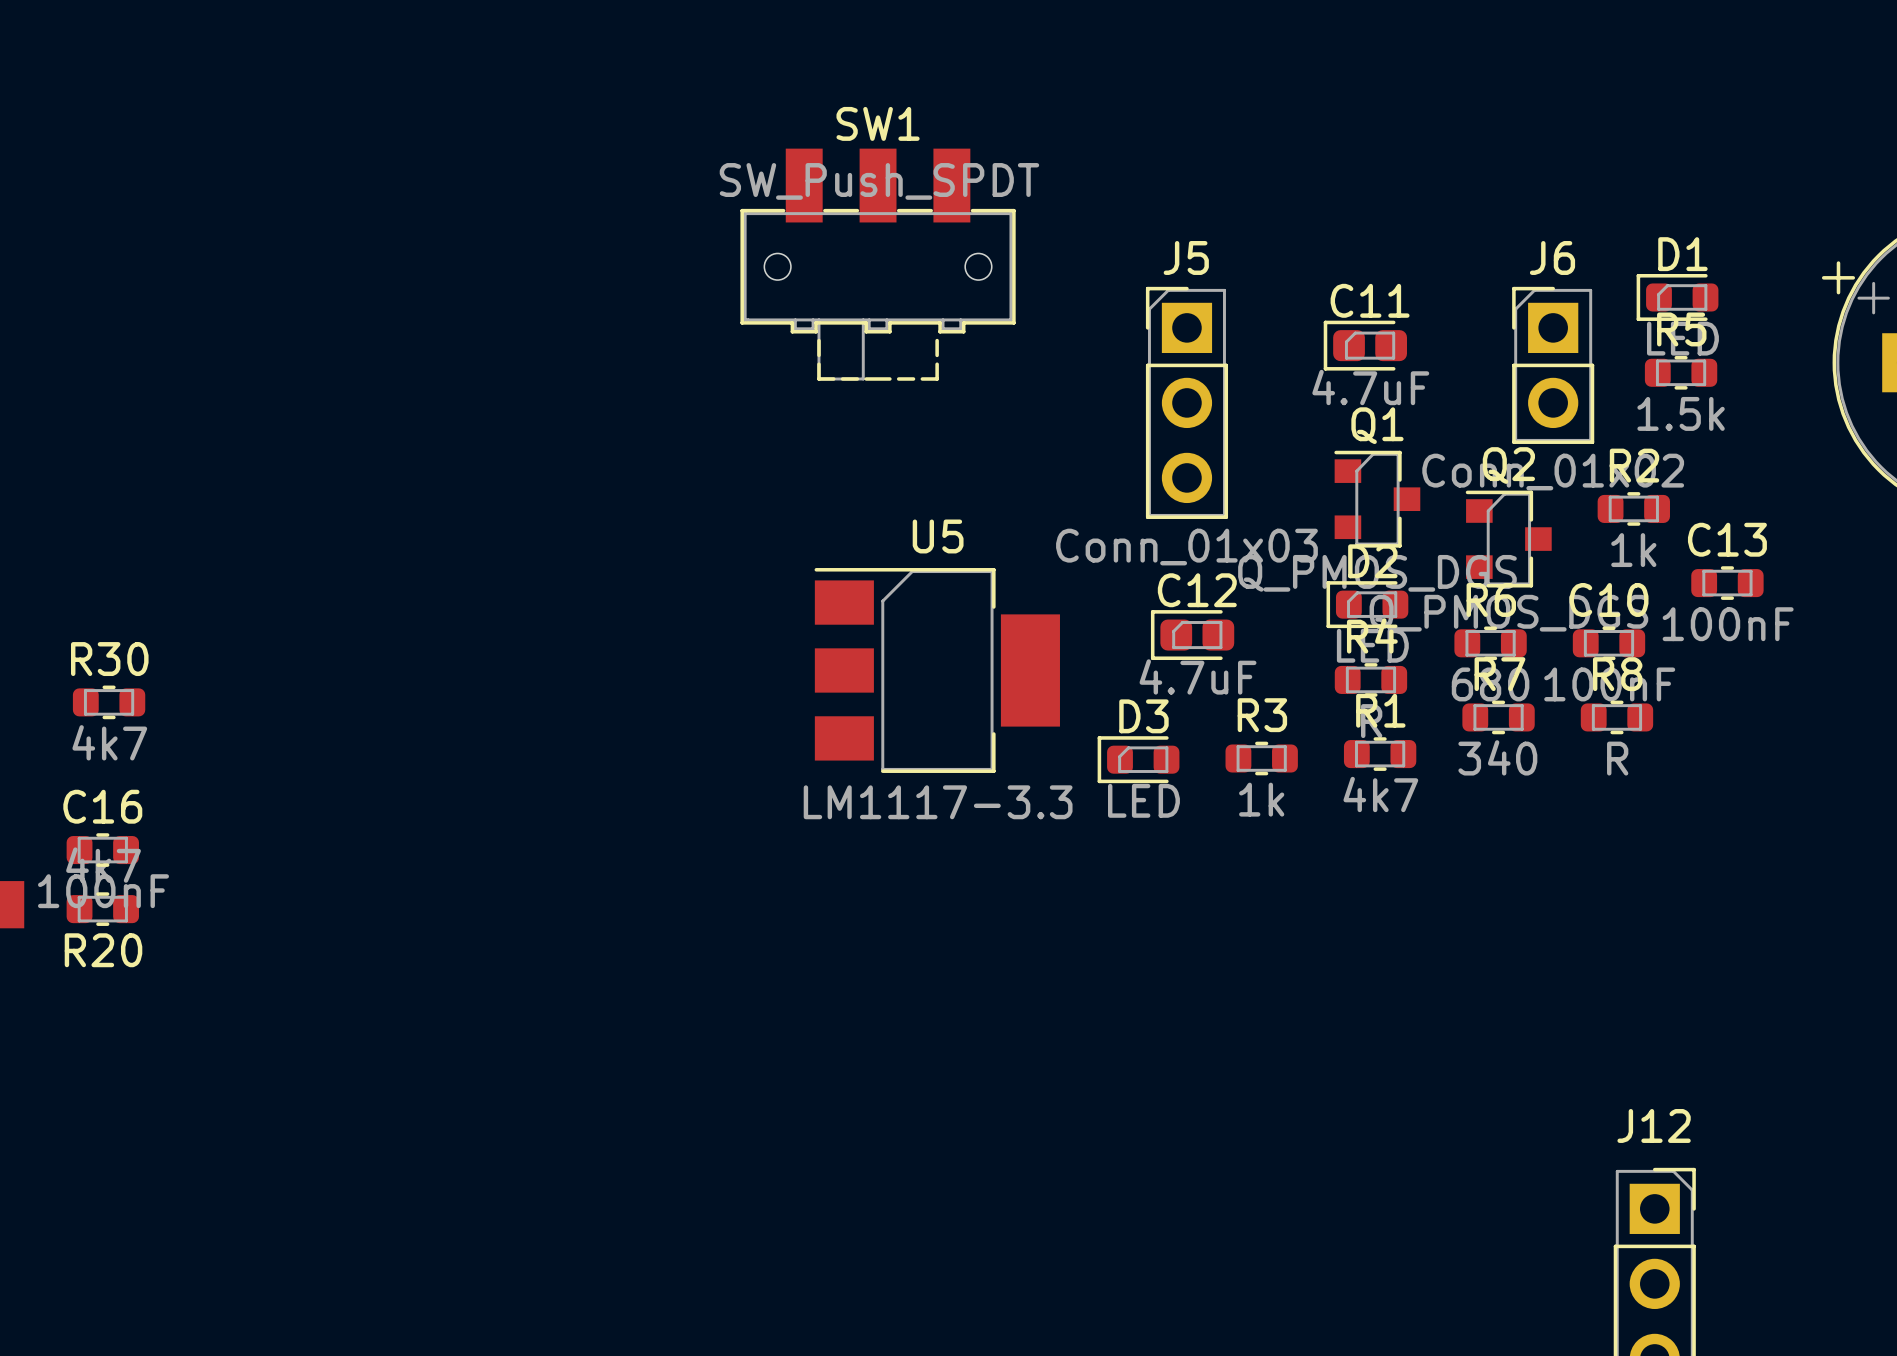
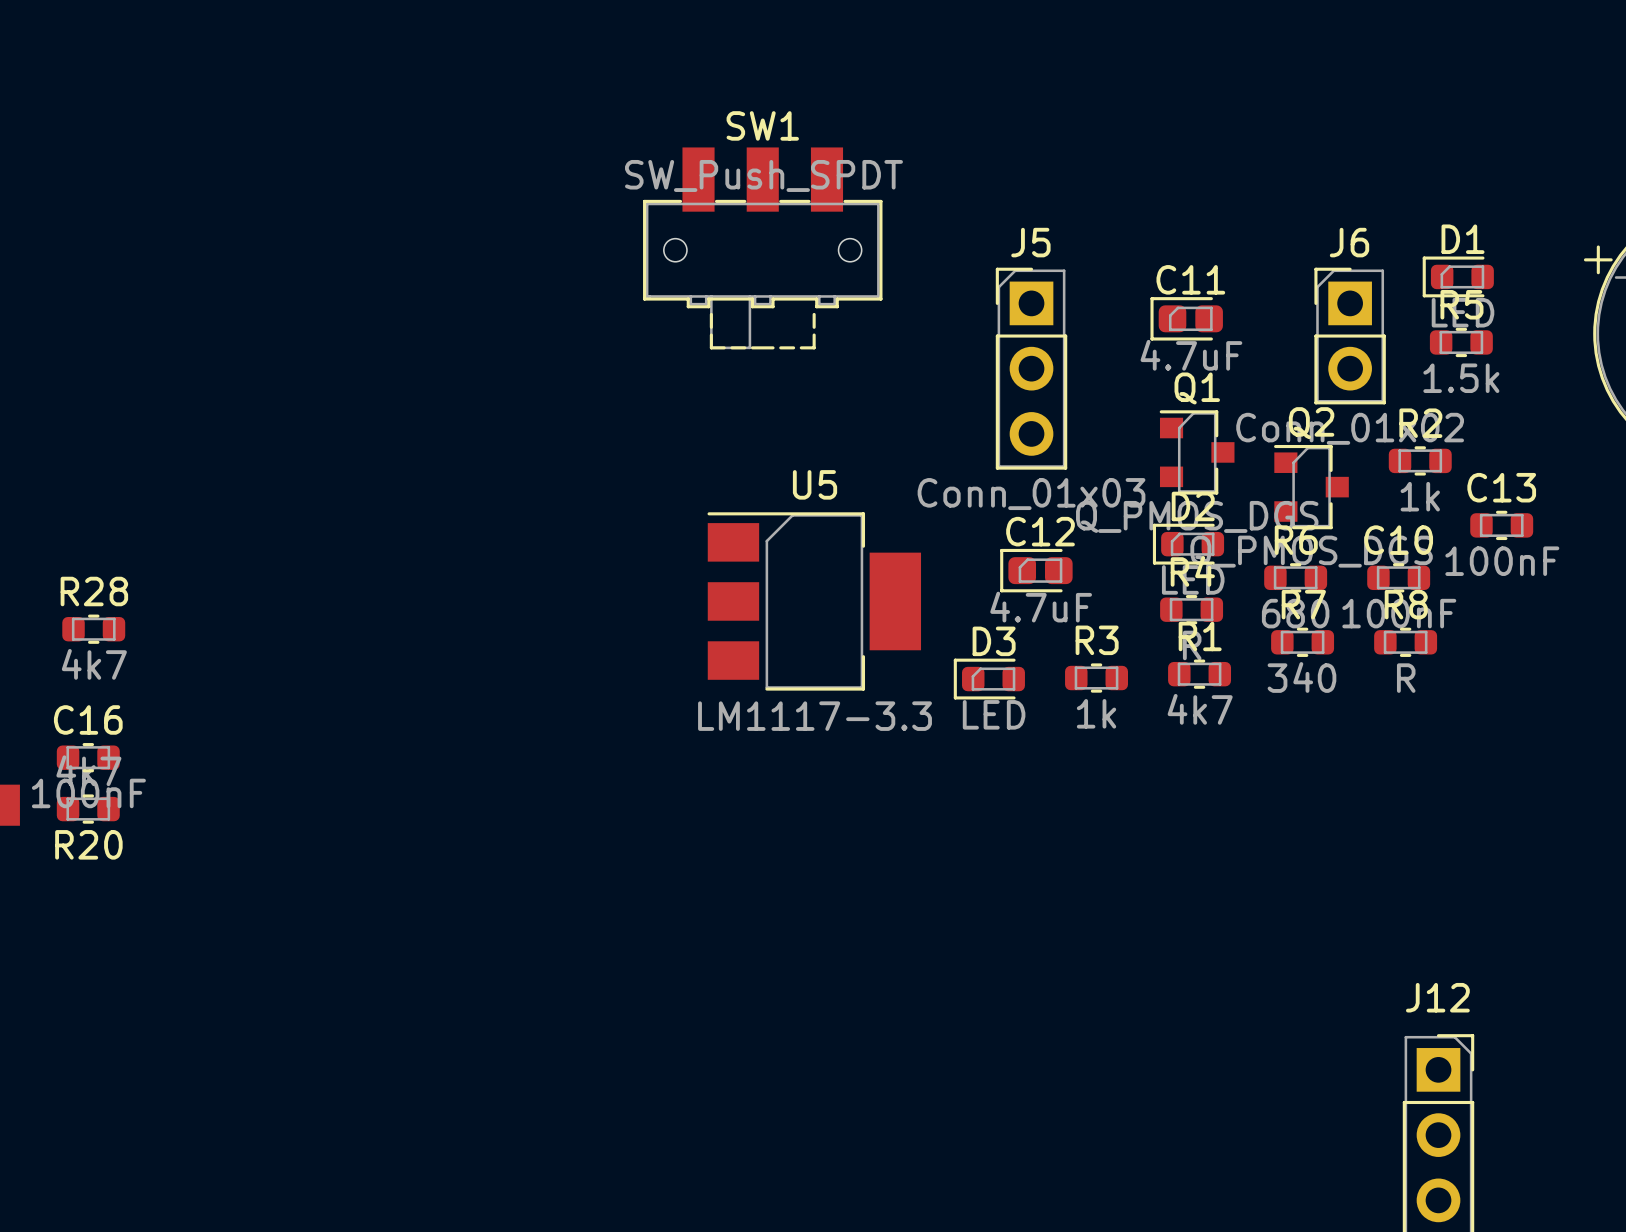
R30 name: R30 (109, 659) -> R28 (94, 591)

